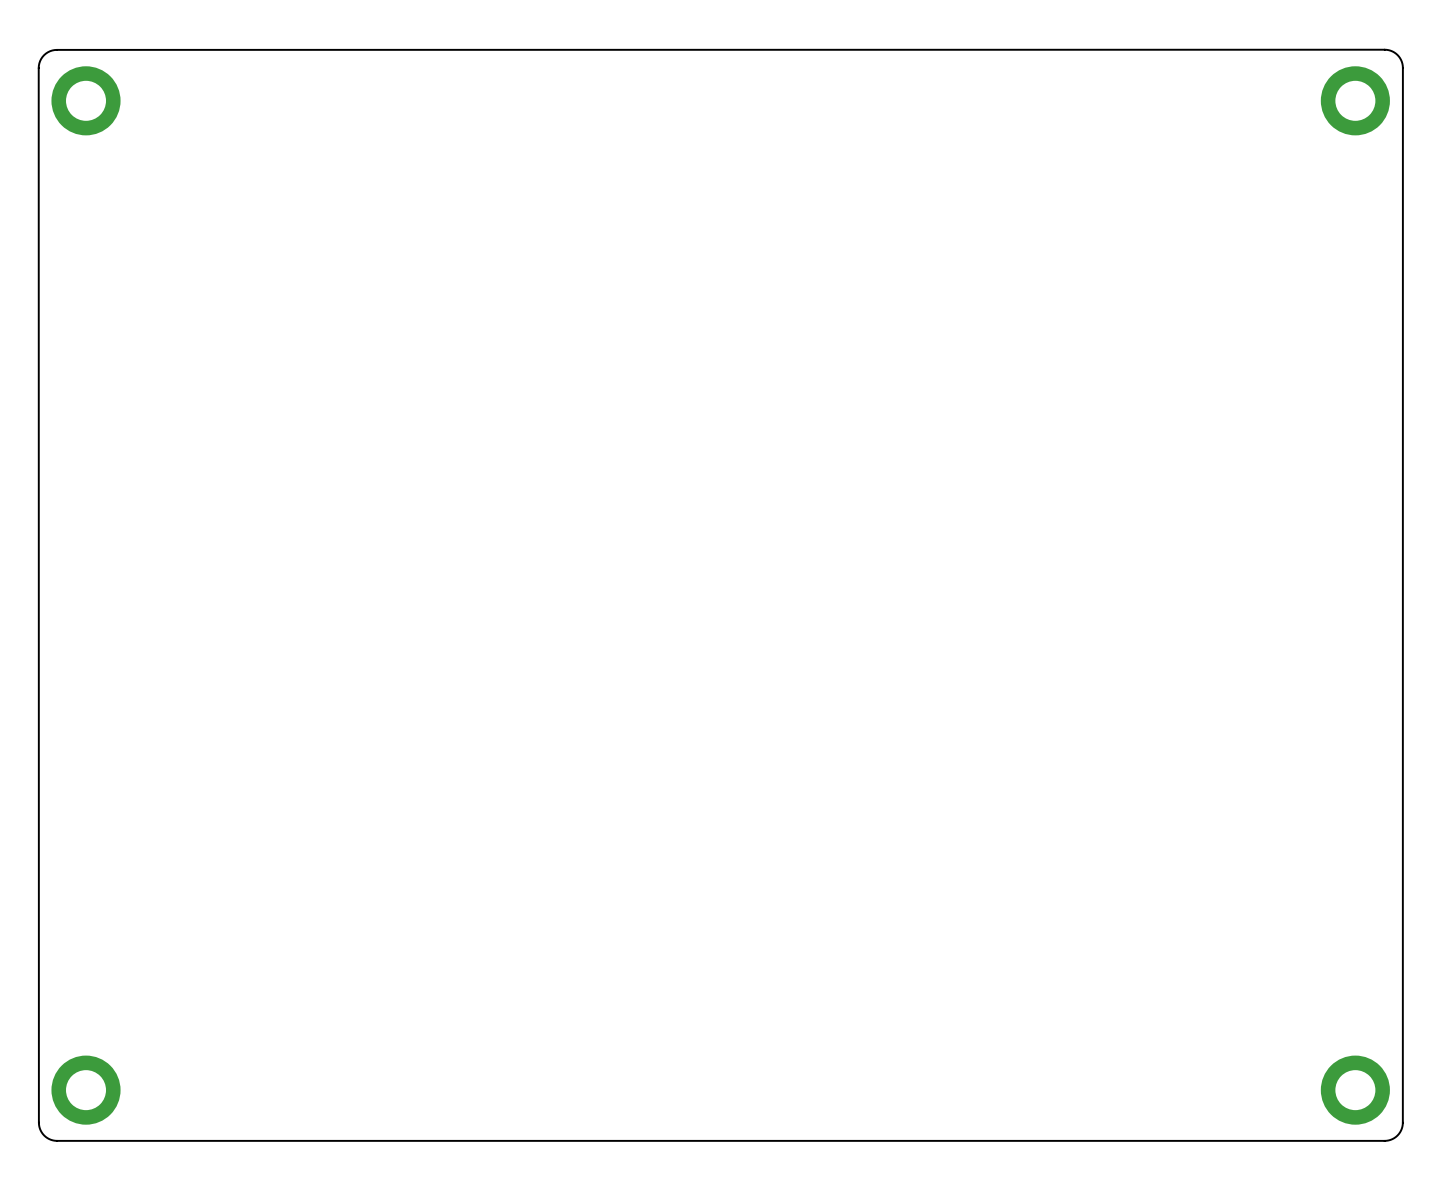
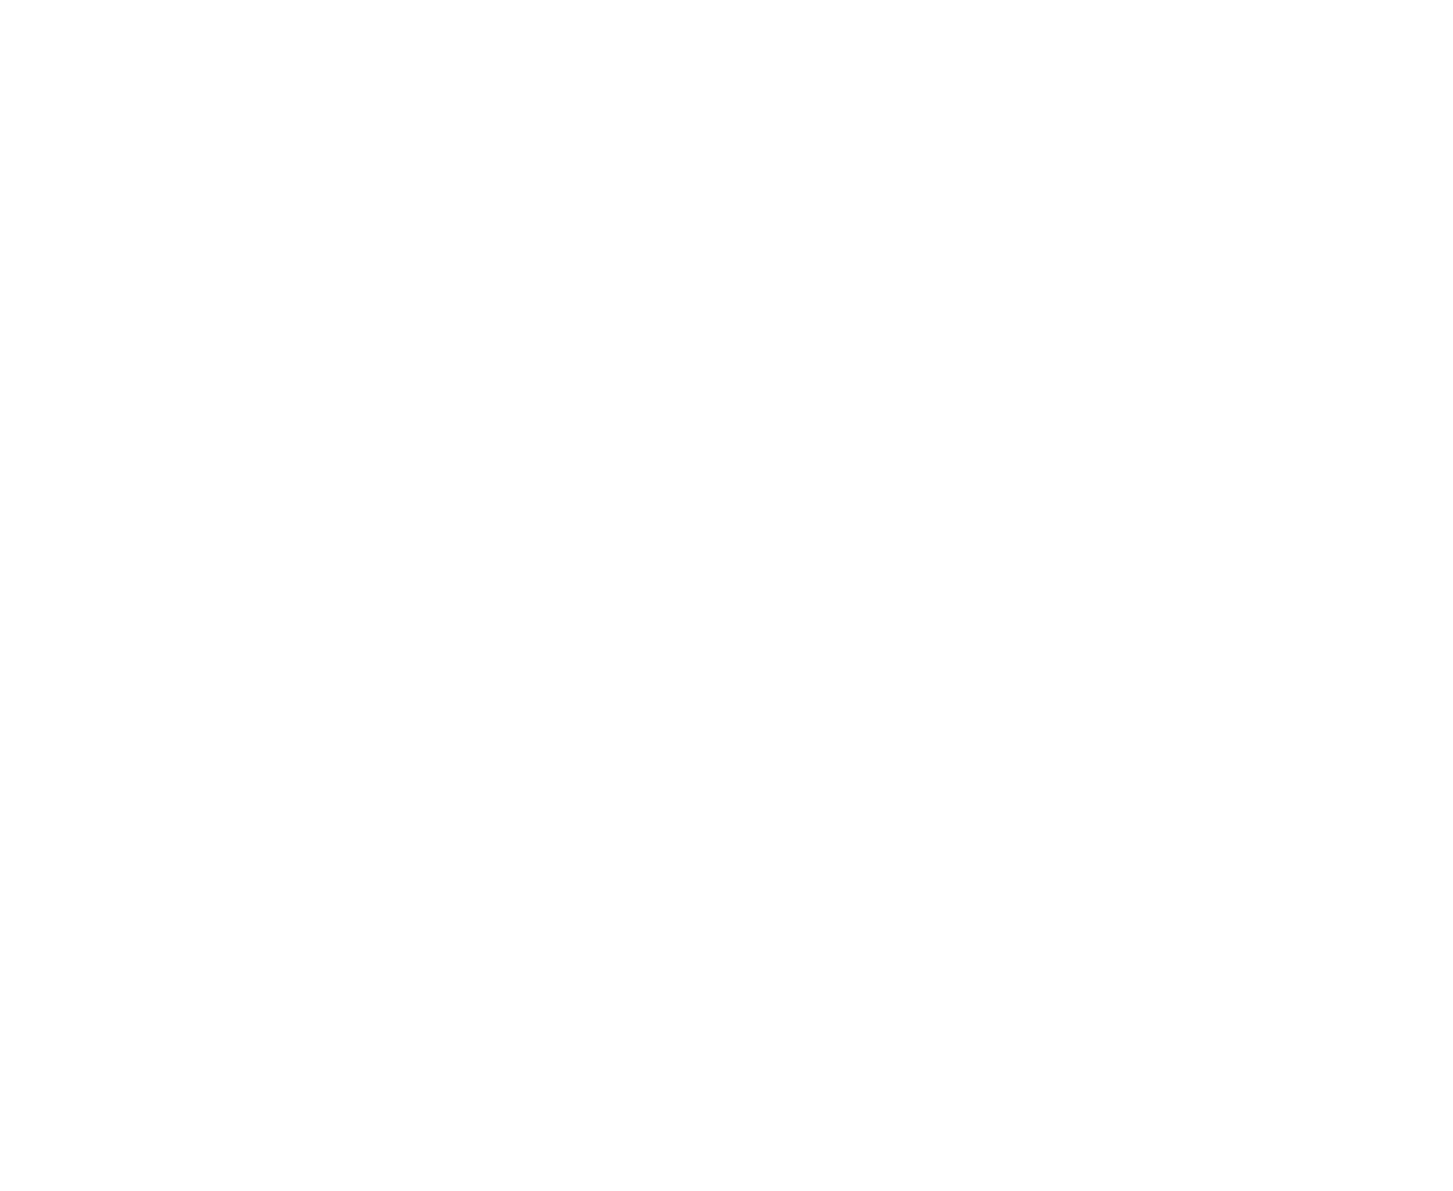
board edge: (1384, 49) (56, 49) (45, 53) (40, 61) (38, 68) (38, 1122) (42, 1134) (49, 1139) (57, 1140) (1384, 1140) (1396, 1136) (1401, 1130) (1402, 1122) (1402, 67) (1397, 55) (1384, 49) -> none
part: (86, 100) -> none
part: (1355, 100) -> none
part: (86, 1090) -> none
part: (1355, 1090) -> none

